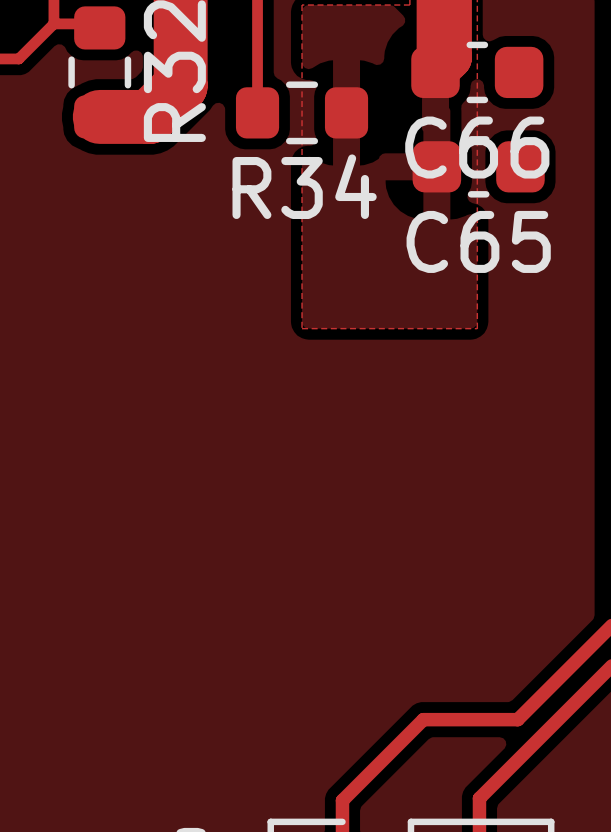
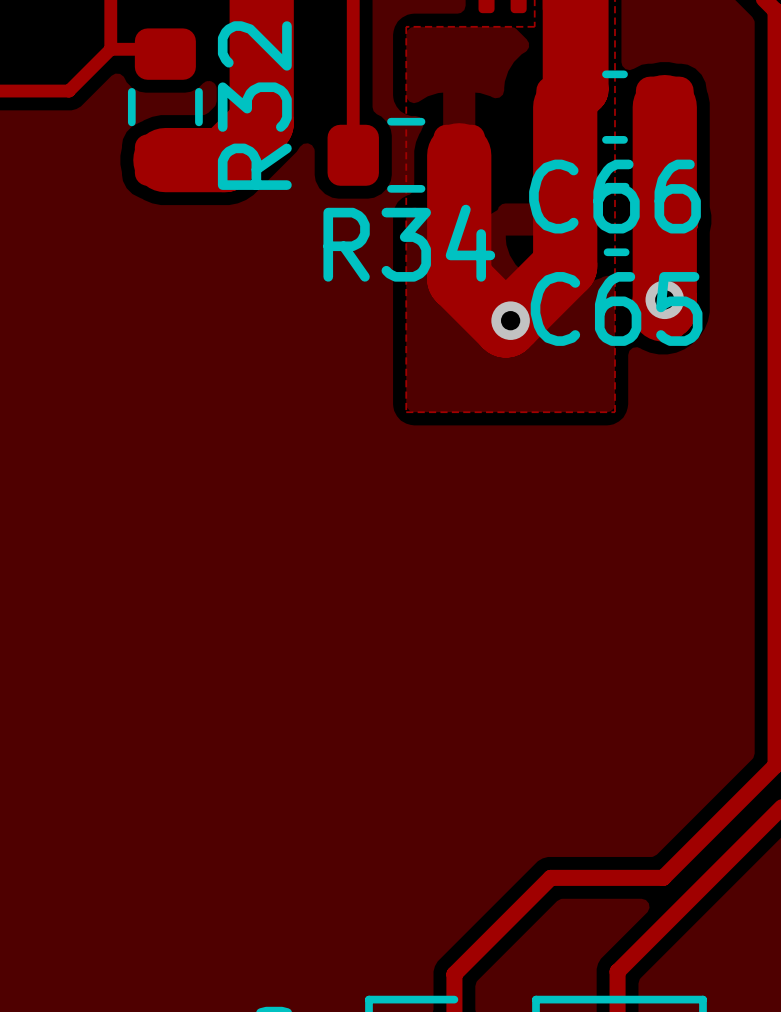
track: none -> (565, 107) (565, 266) (505, 325) (459, 278) (459, 155)
track: none -> (664, 107) (664, 217) (666, 219) (664, 221) (664, 307) (663, 309)
via: none -> (664, 299)
via: none -> (510, 320)

